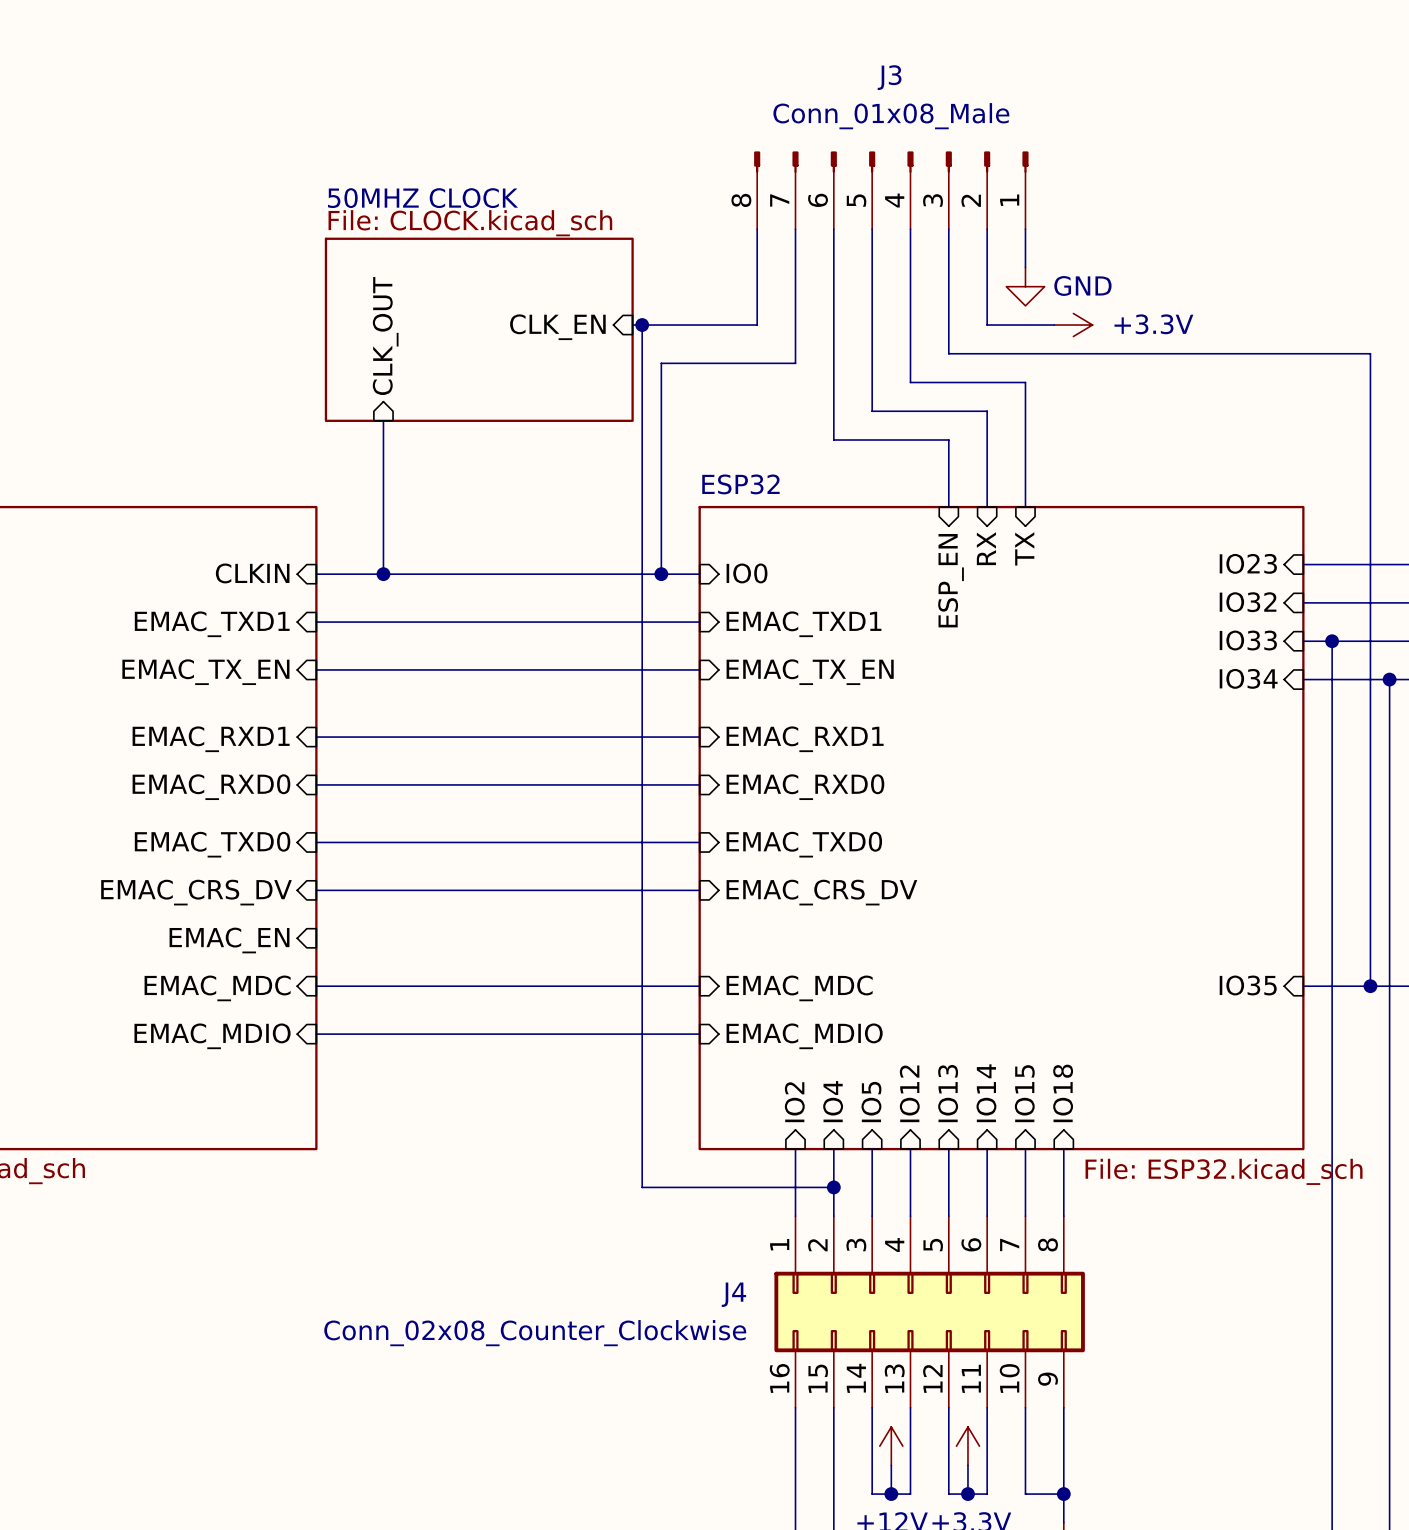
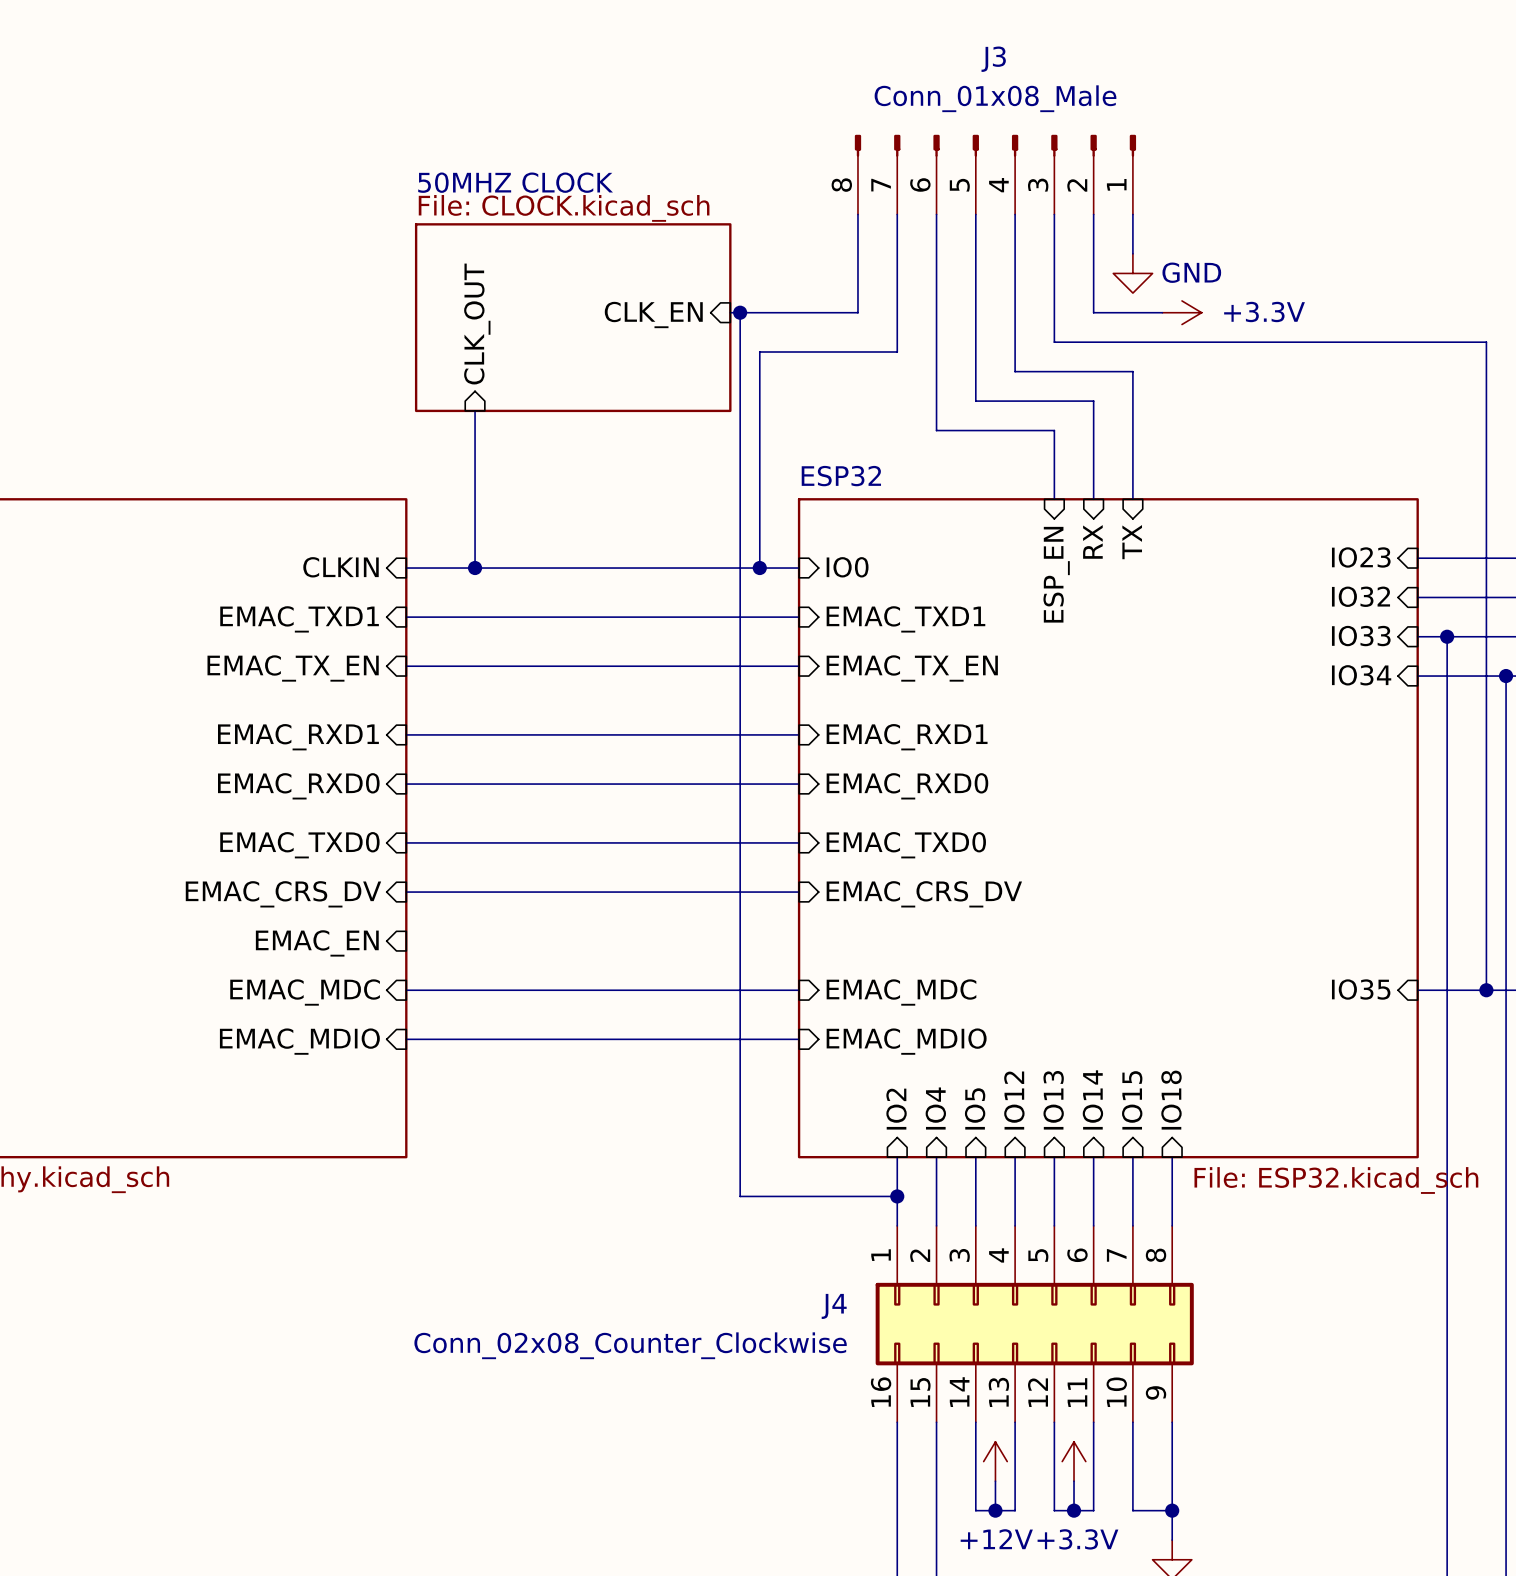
wire: (795, 1187) (833, 1187) -> none
junction position: (833, 1187) -> (897, 1196)

